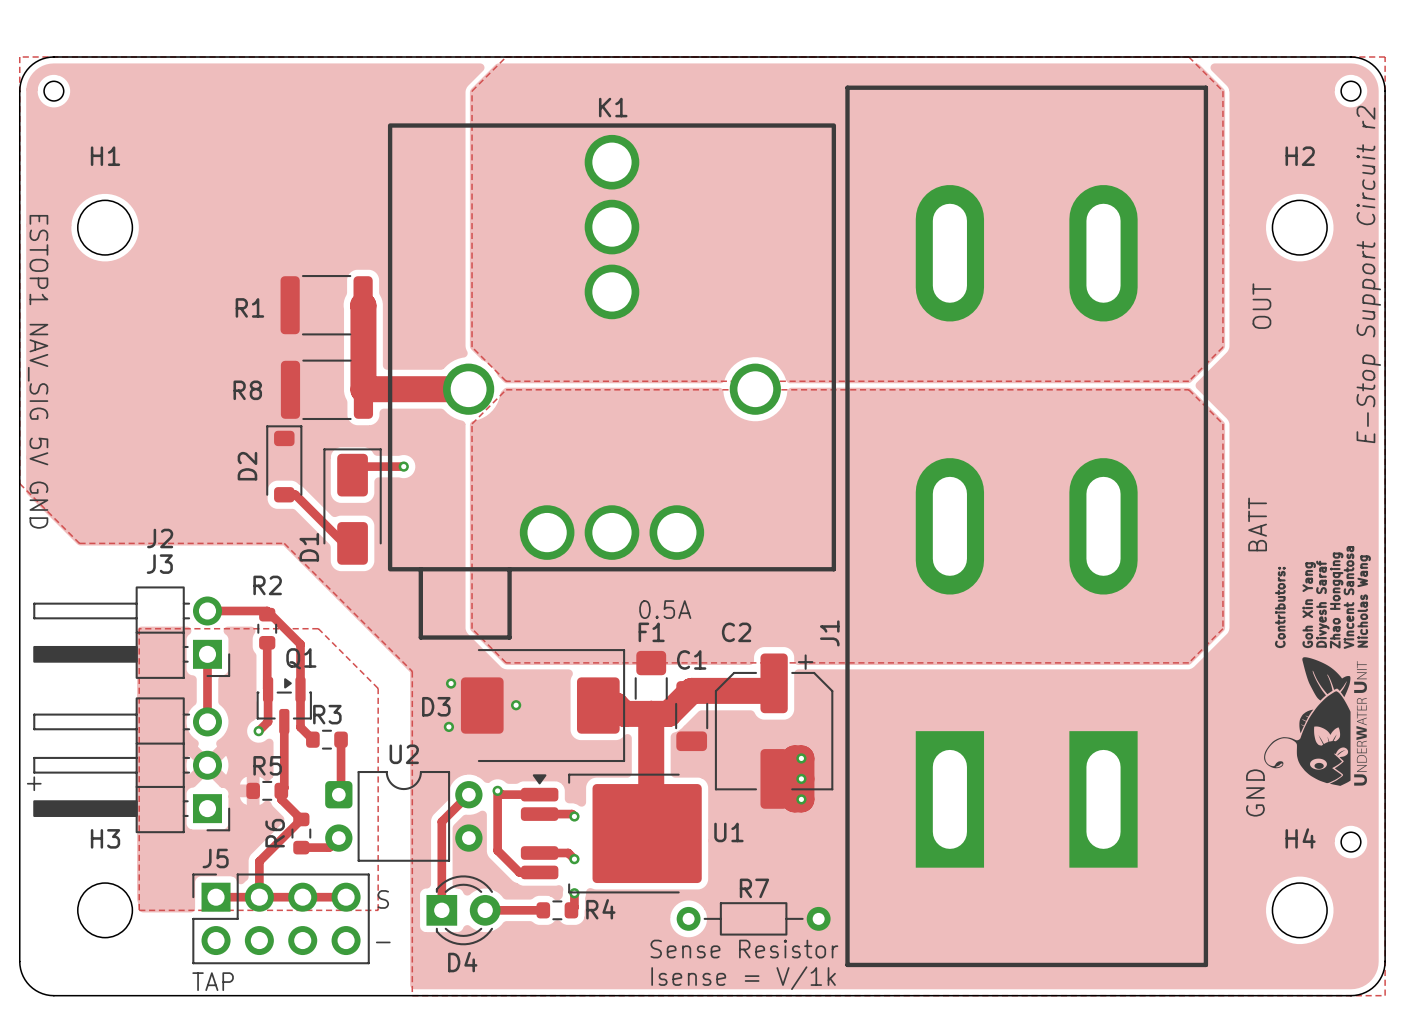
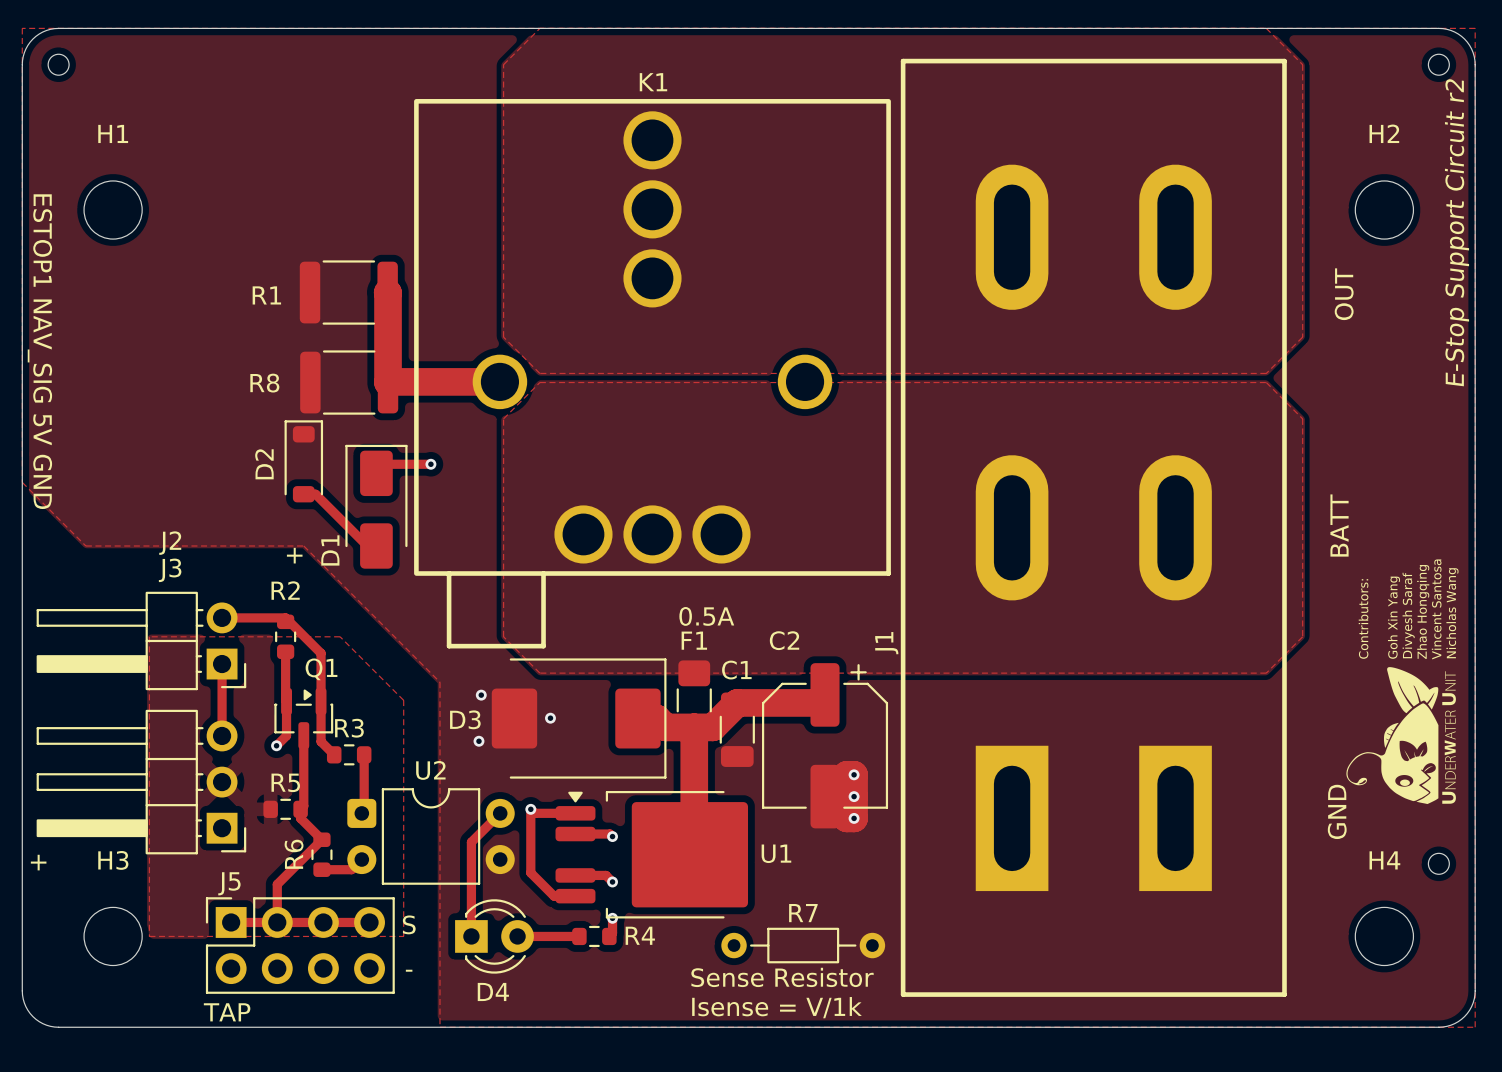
text: none -> + (294, 555)
text position: + (34, 783) -> + (38, 862)

